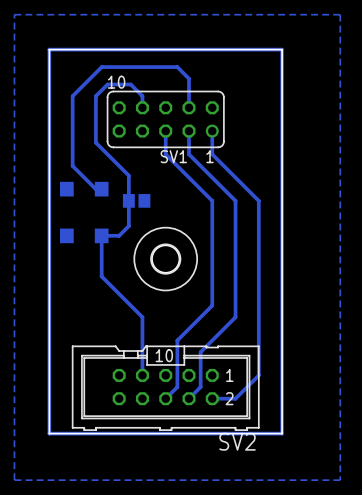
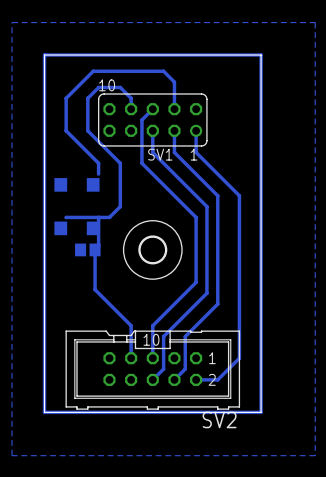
bottom track: (72, 131) (72, 165) (95, 189) (101, 189) -> (66, 130) (98, 163) (98, 174)
bottom track: (95, 131) (95, 142) (128, 175) (128, 226) (119, 235) (101, 235) -> (87, 130) (120, 163) (120, 206) (109, 217) (66, 217)
part position: (136, 200) -> (87, 249)
bottom track: (212, 200) (212, 224) -> (152, 109) (141, 119) (141, 163) (196, 217)
bottom track: none -> (196, 195) (206, 206) (206, 293) (163, 336)
bottom track: (101, 235) (101, 276) (142, 317) (142, 340) -> (98, 217) (98, 246) (95, 249) (95, 289) (131, 325)
bottom track: (212, 293) (212, 305) (177, 340) (177, 352) -> (196, 282) (152, 325) (152, 358)

